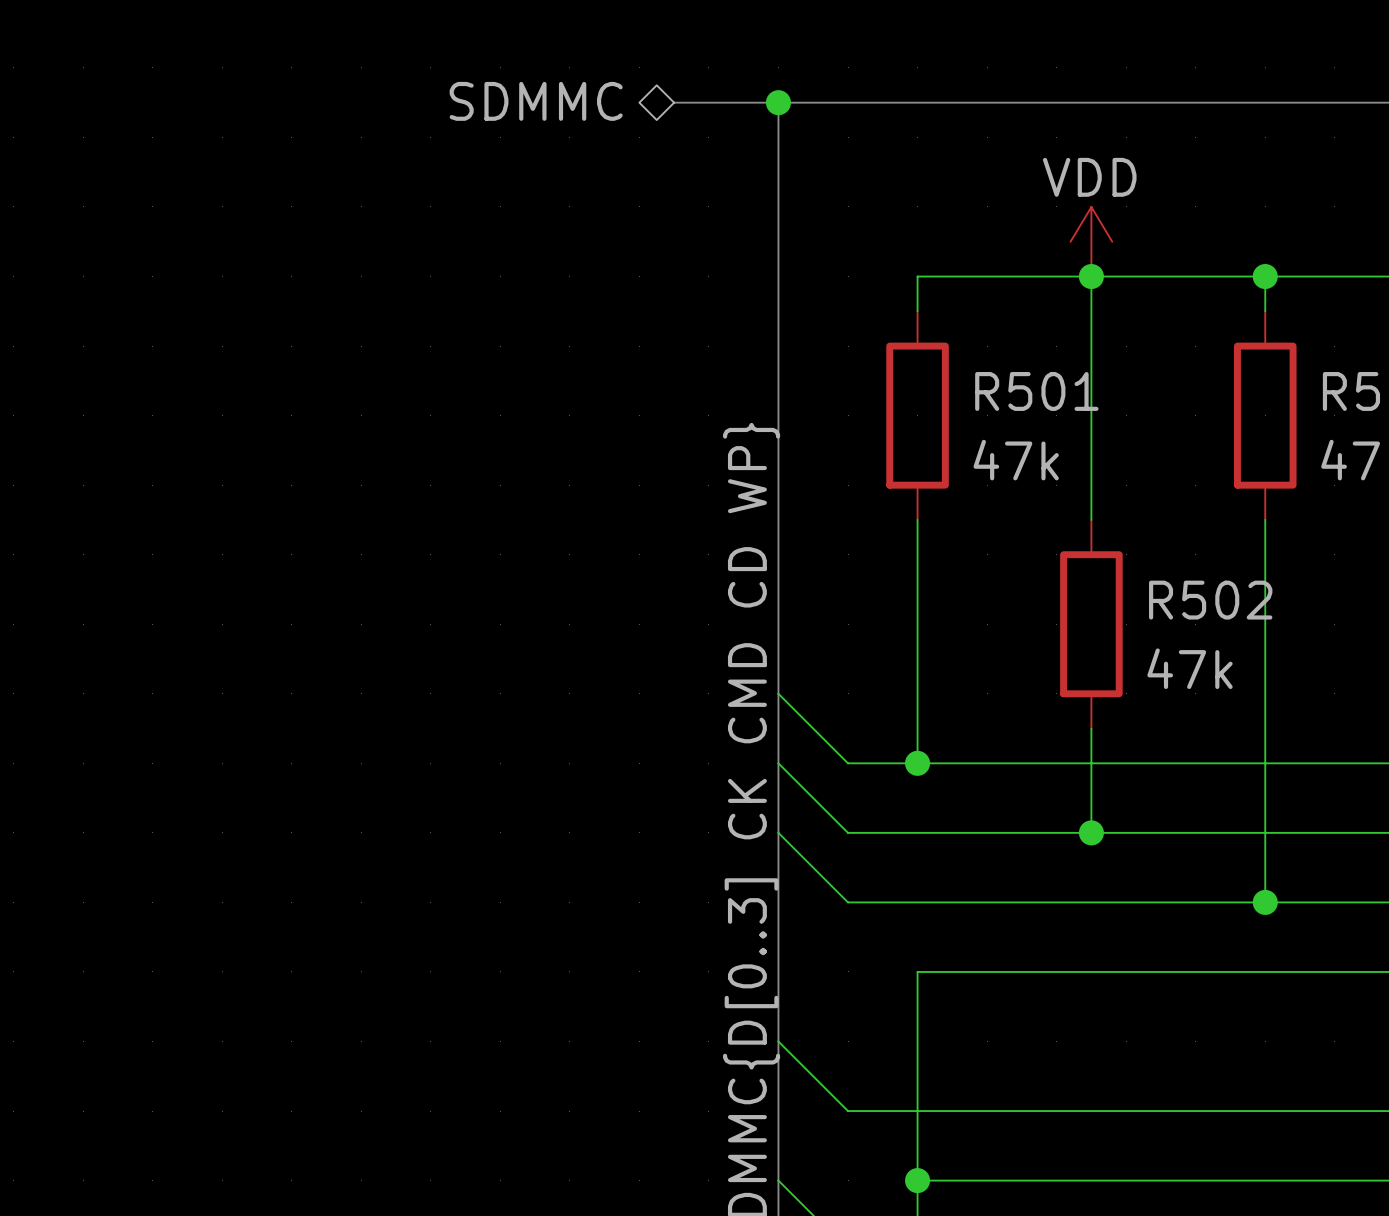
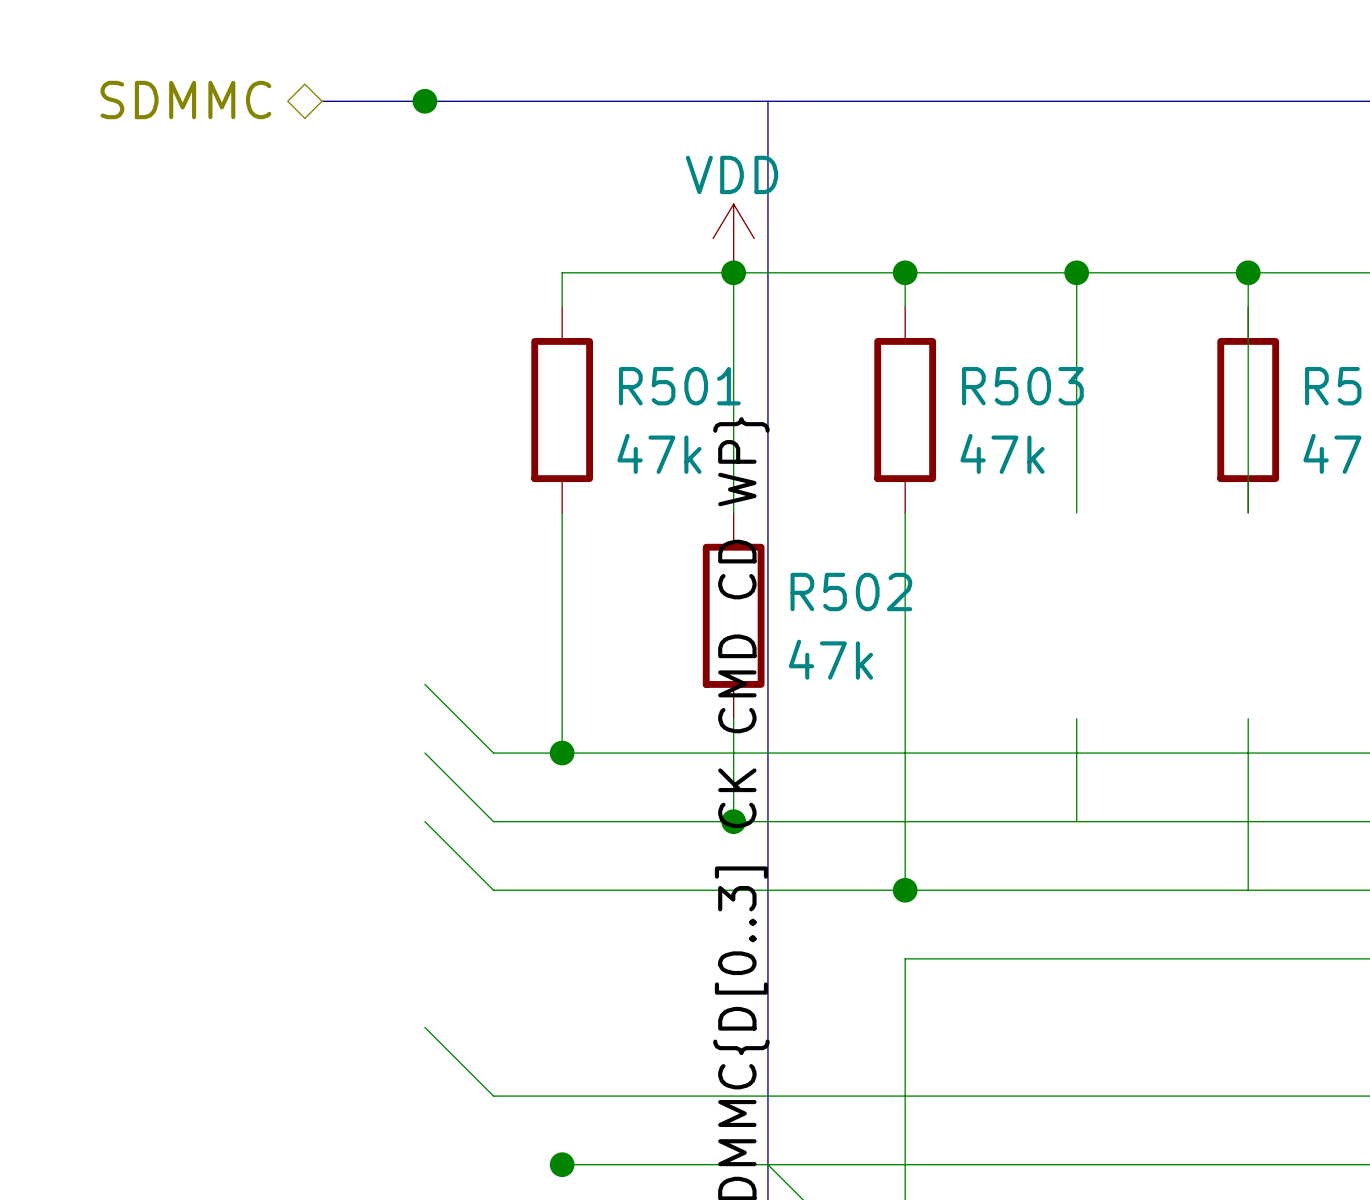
hierarchical label position: SDMMC (536, 101) -> SDMMC (185, 100)
bus: none -> (322, 101) (665, 101)
junction: none -> (424, 101)
junction: (778, 102) -> none
power symbol position: VDD (1091, 241) -> VDD (733, 238)
wire: none -> (733, 272) (733, 512)
junction: none -> (733, 272)
wire: none -> (905, 272) (562, 272) (562, 307)
junction: none -> (905, 272)
R501 name: R501 (1036, 391) -> R503 (1022, 386)
R501: none -> 47k (562, 410)
wire: none -> (562, 512) (562, 753)
wire: (1265, 519) (1265, 728) -> (1248, 512) (1248, 307)
R502 position: (1091, 624) -> (733, 615)
wire: (778, 693) (848, 763) -> (424, 684) (493, 753) (836, 753)
wire: none -> (733, 718) (733, 821)
junction: none -> (562, 753)
wire: (778, 763) (848, 832) -> (424, 753) (493, 821) (836, 821)
wire: none -> (905, 753) (905, 890)
junction: (917, 763) -> none
junction: none -> (733, 821)
wire: (778, 832) (848, 902) -> (424, 821) (493, 890) (836, 890)
junction: (1091, 832) -> none
junction: none -> (905, 890)
junction: (1265, 902) -> none
wire: (778, 1041) (848, 1111) -> (424, 1027) (493, 1096) (836, 1096)
wire: none -> (562, 1164) (905, 1164)
junction: none -> (562, 1164)
junction: (917, 1180) -> none

